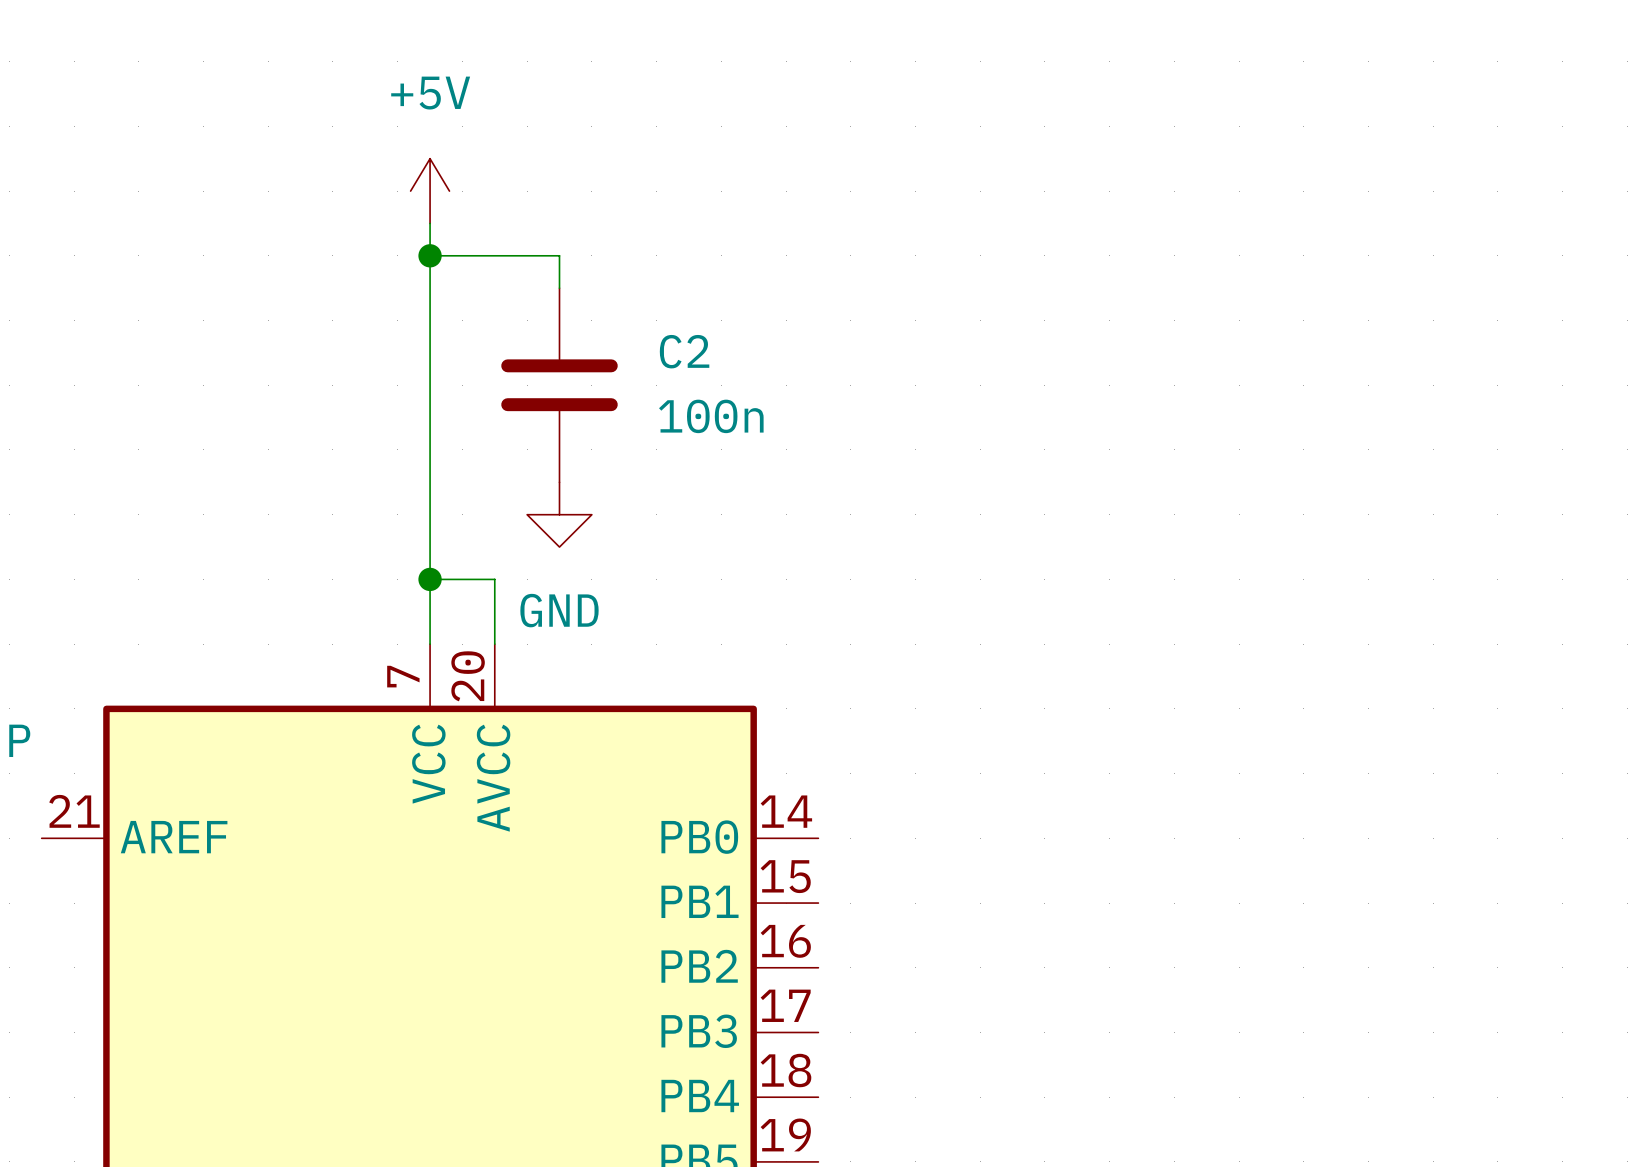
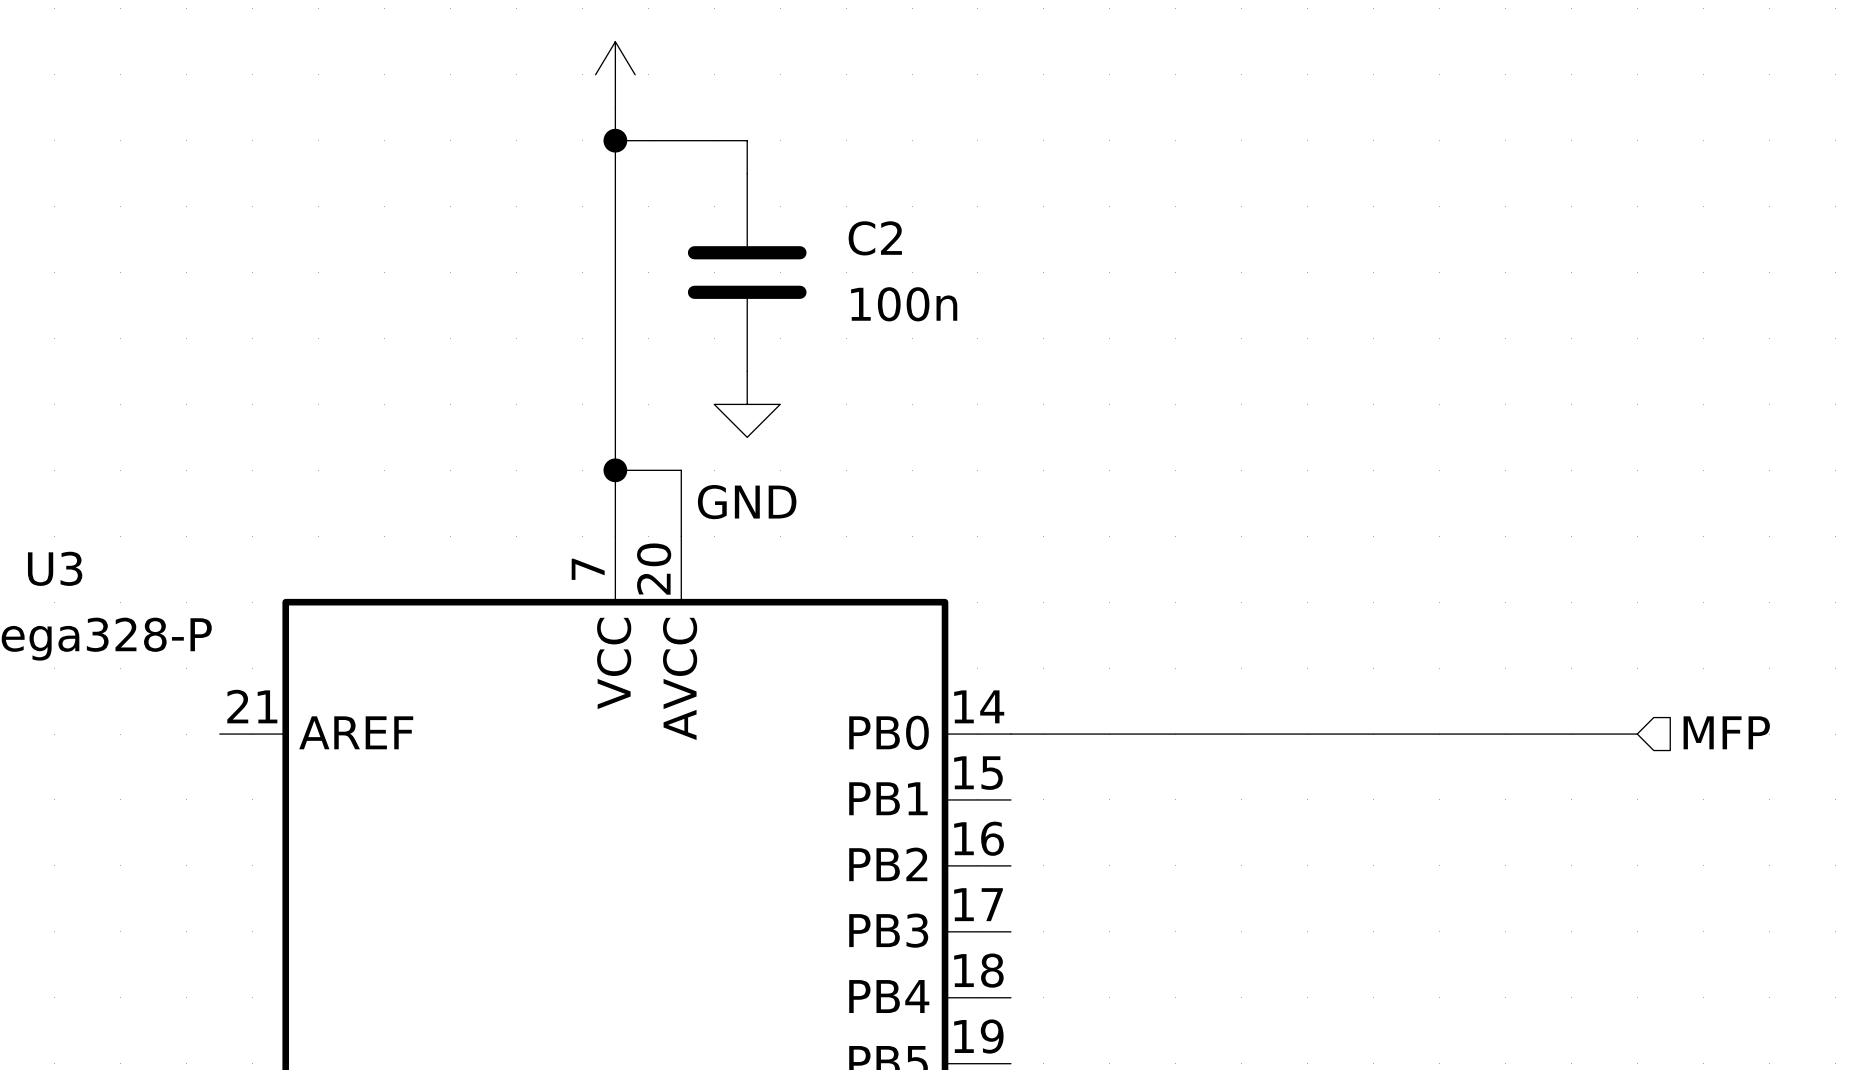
hierarchical label: none -> MFP (1726, 732)
wire: none -> (1010, 734) (1637, 734)

